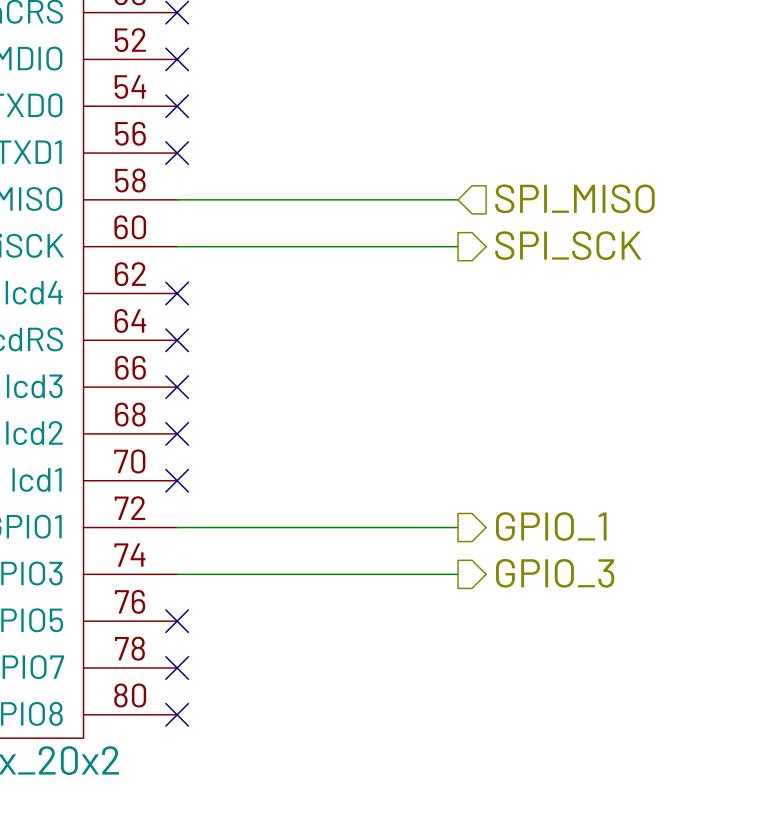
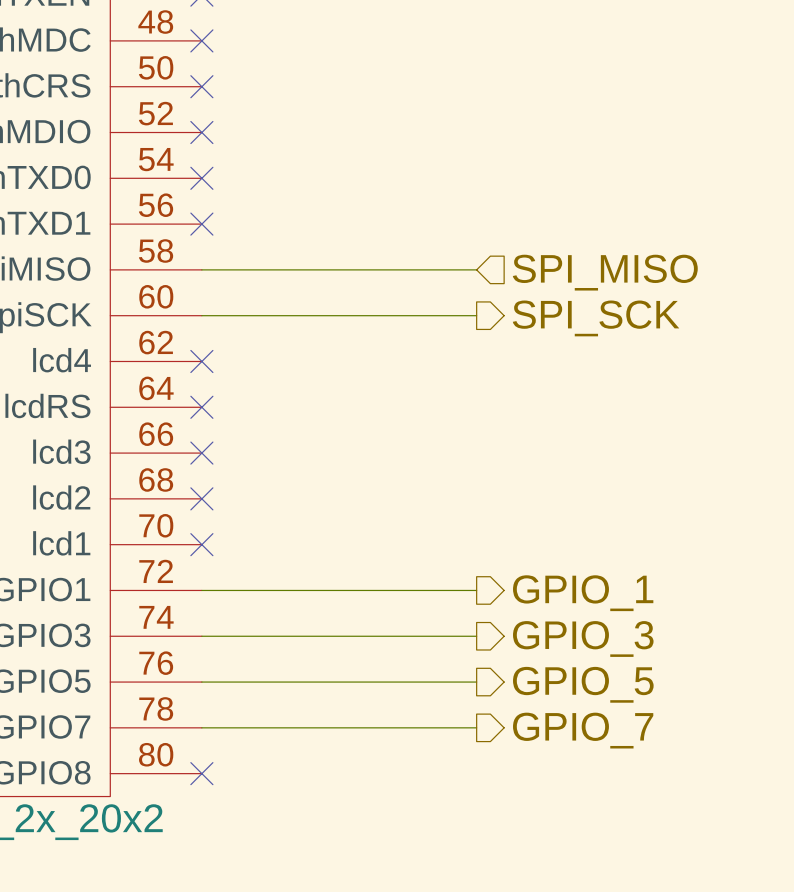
hierarchical label: none -> GPIO_5 (583, 684)
wire: none -> (201, 682) (476, 682)
no-connect mark: (177, 621) -> none
hierarchical label: none -> GPIO_7 (583, 730)
wire: none -> (201, 727) (476, 727)
no-connect mark: (177, 667) -> none

